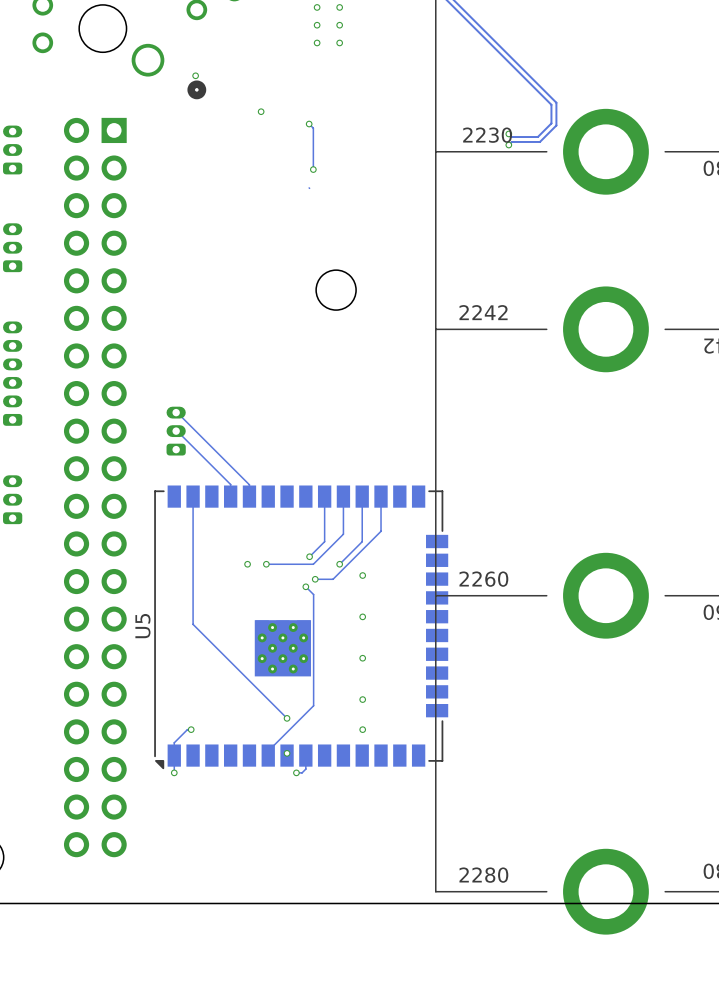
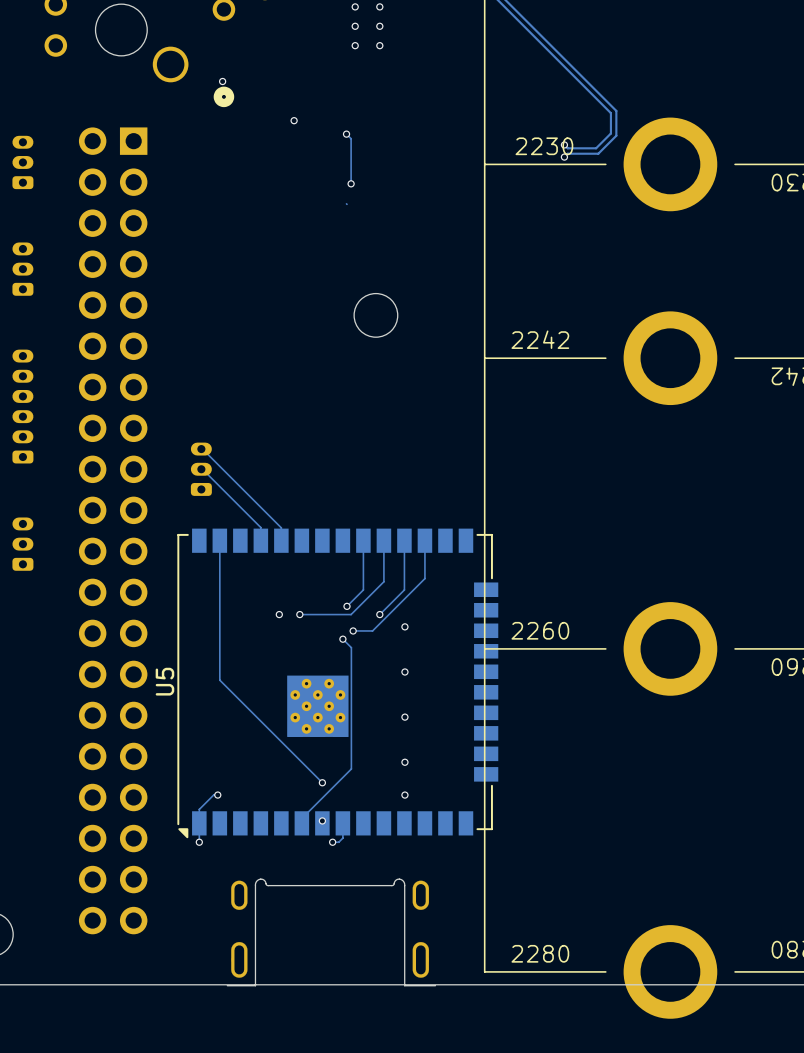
part: none -> (331, 932)

